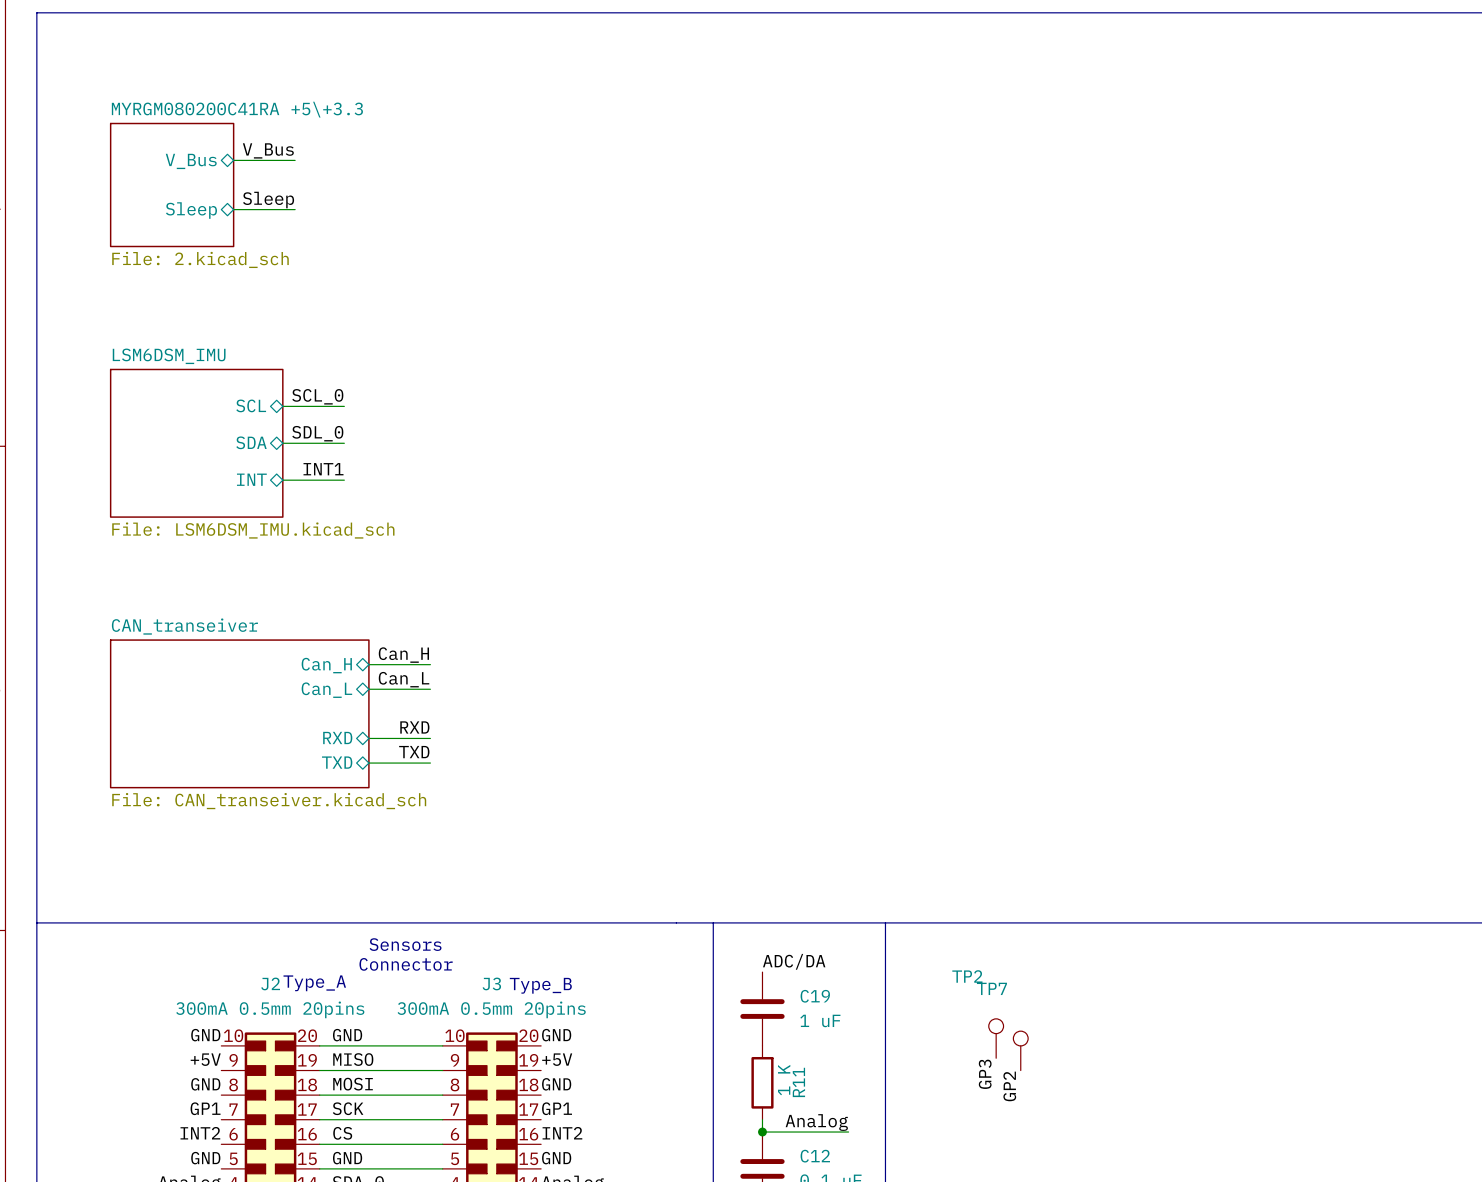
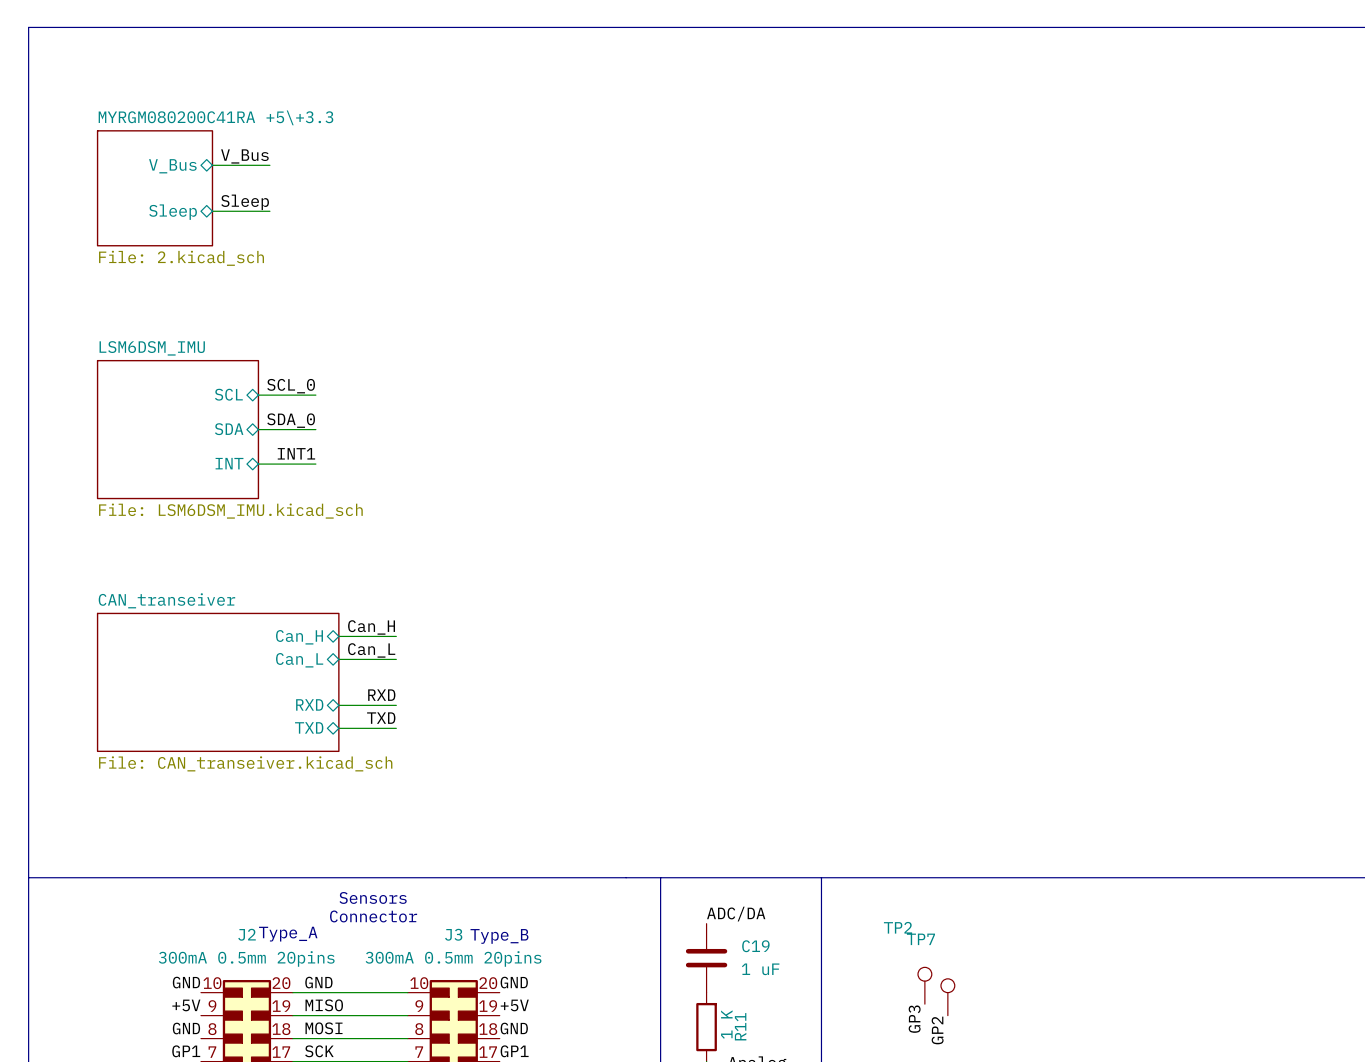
label: SDL_0 (317, 433) -> SDA_0 (291, 420)

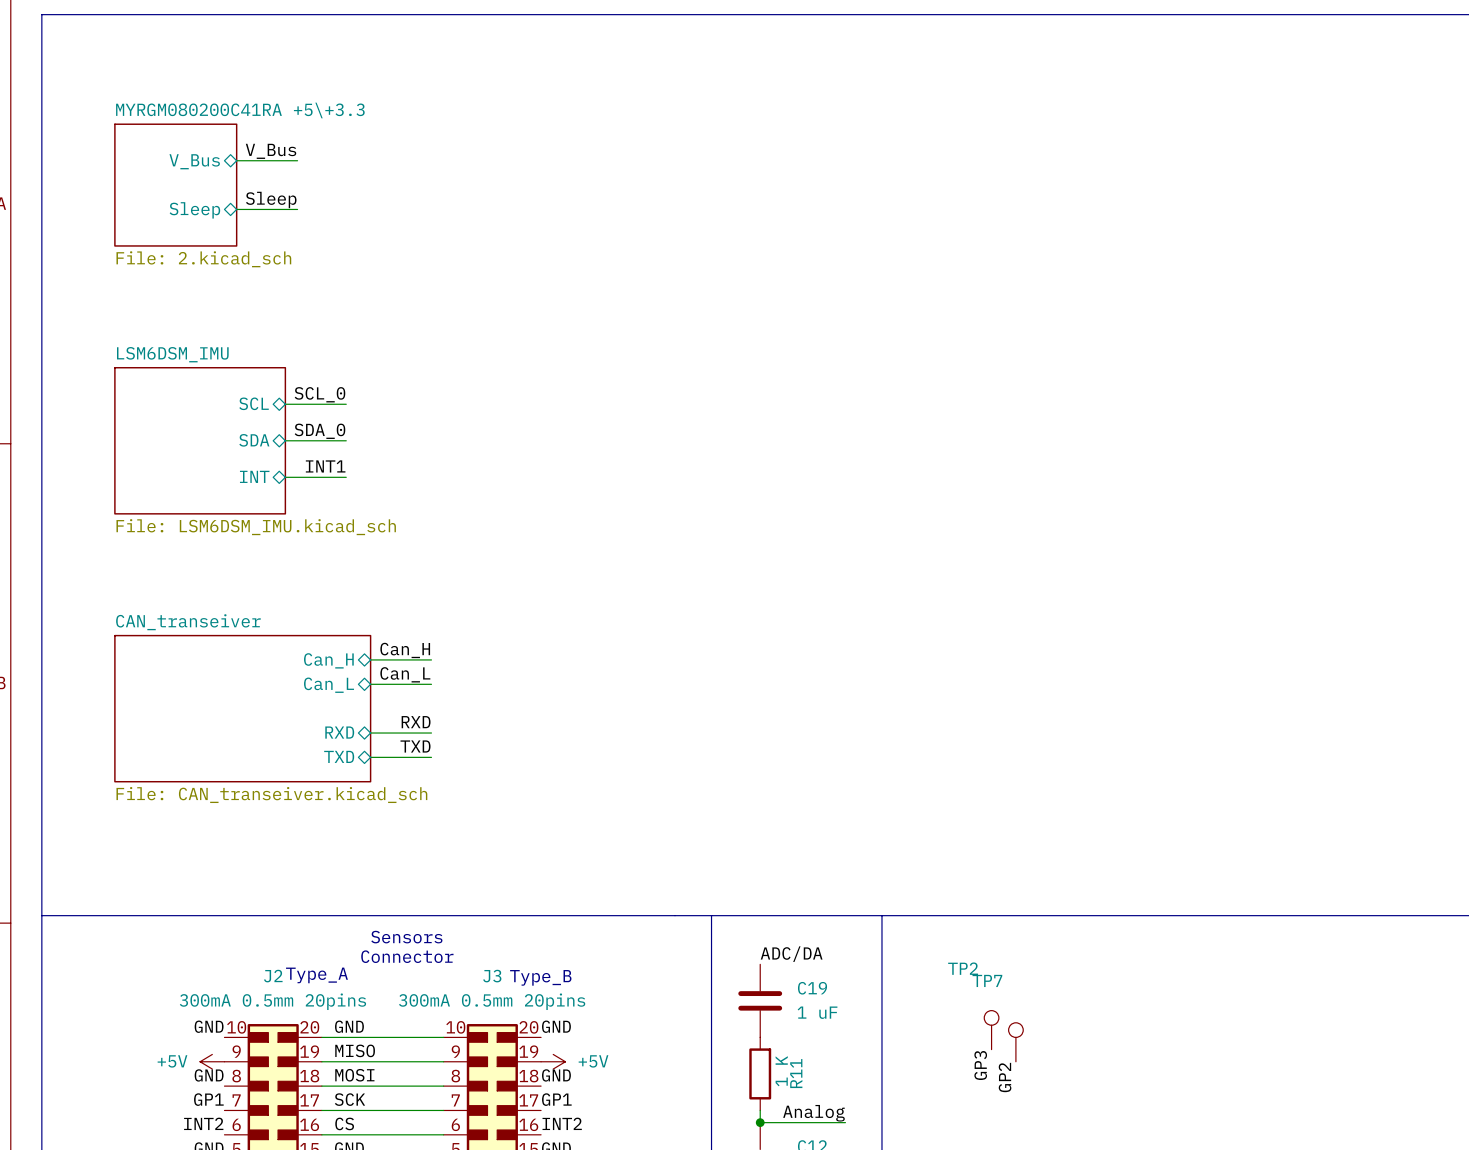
label: +5V (186, 1005) -> none
label: +5V (514, 1005) -> none
power symbol: none -> +5V (212, 1061)
power symbol: none -> +5V (553, 1061)

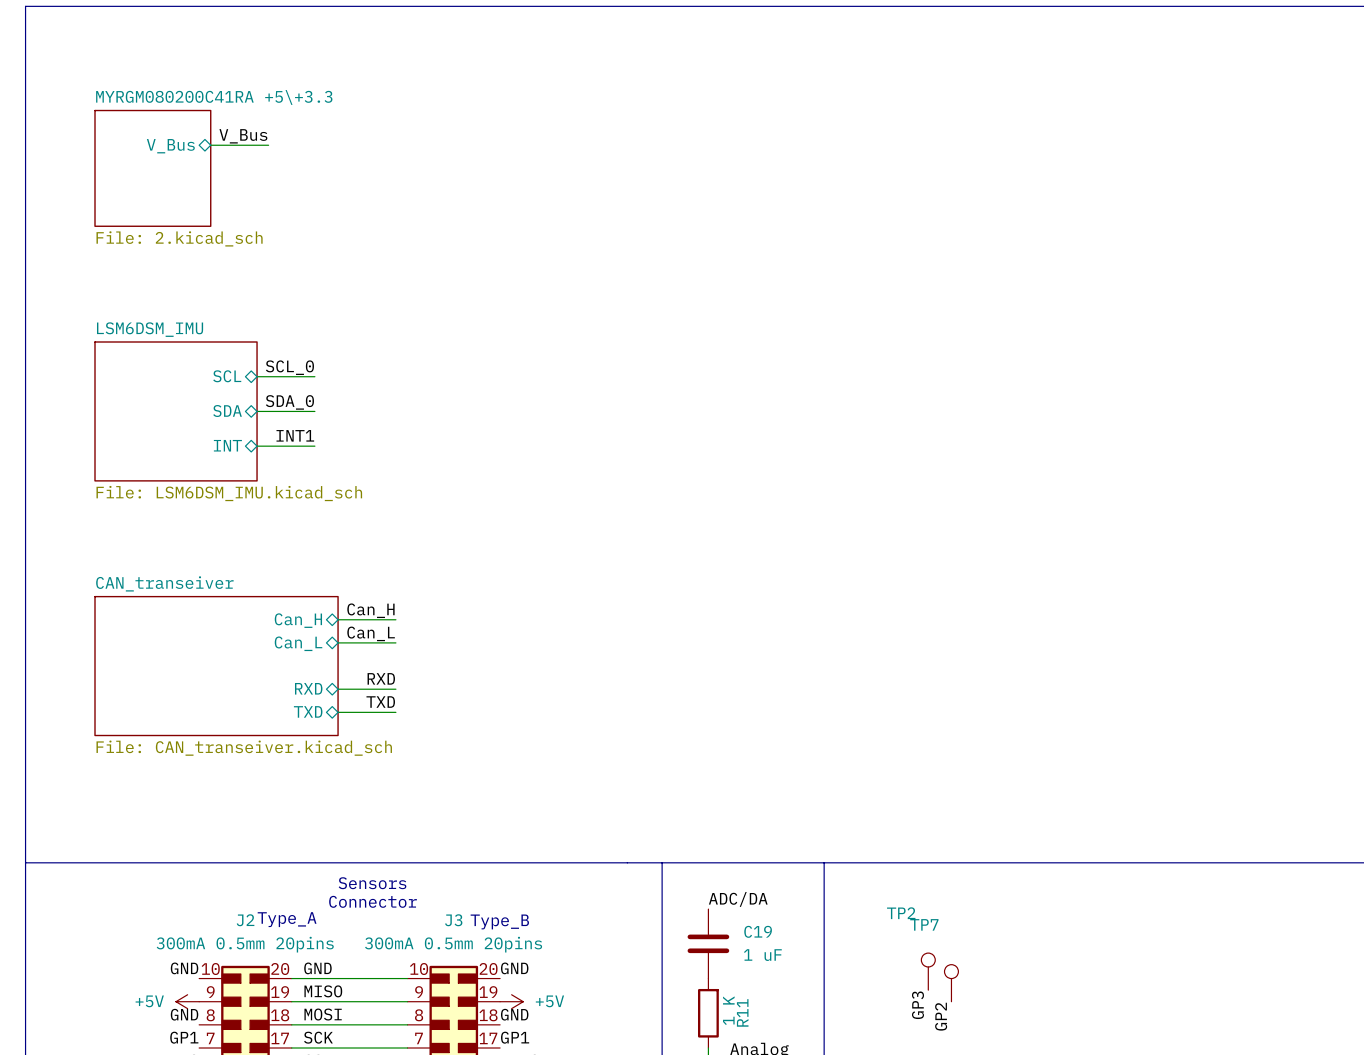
label: Sleep (271, 199) -> none
wire: (236, 209) (297, 209) -> none
sheet pin: Sleep (194, 210) -> none

